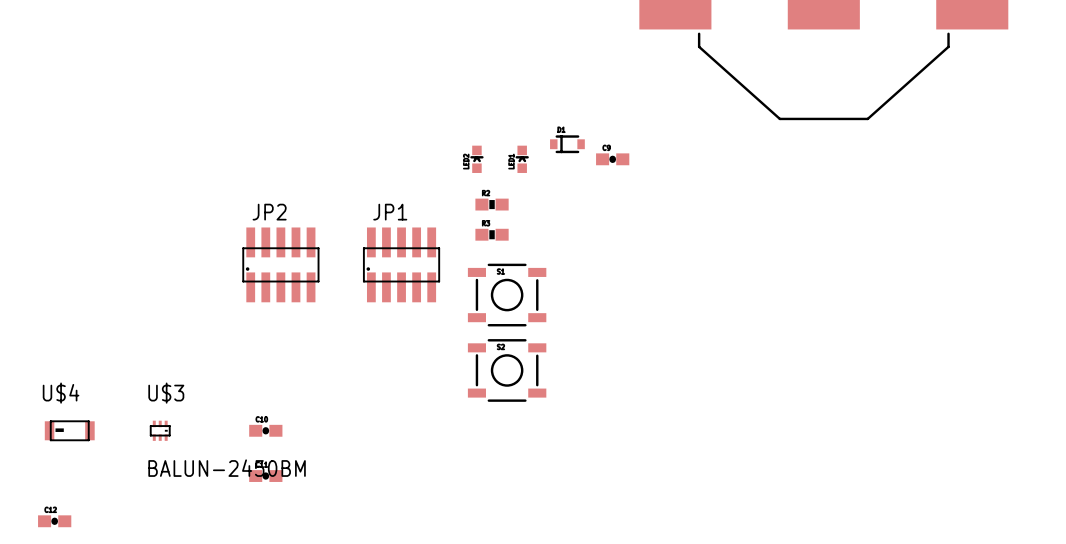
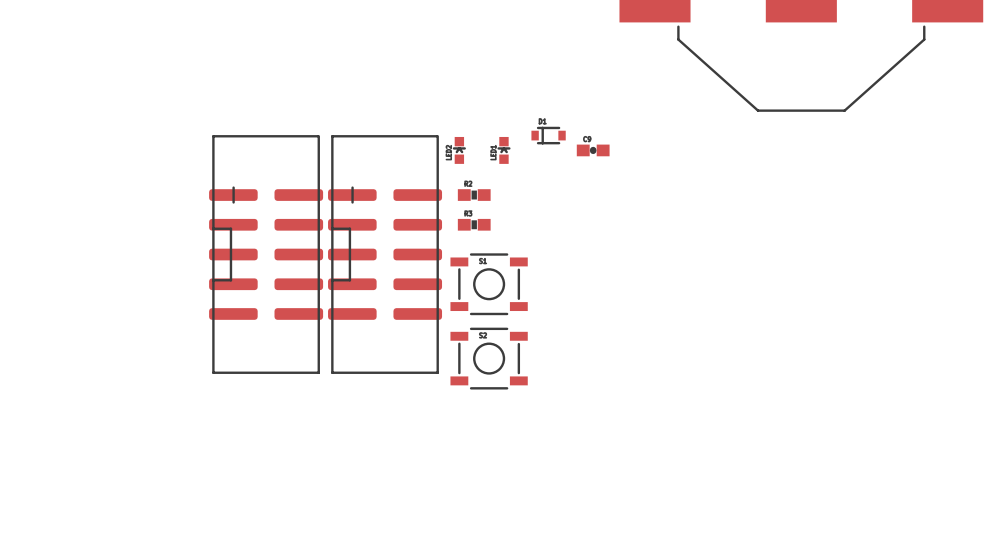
JP2: (280, 264) -> none
part: none -> (266, 254)
JP1: (401, 264) -> none
part: none -> (385, 254)
U$4: (69, 430) -> none
U$3: BALUN-2450BM (160, 430) -> none
part: (265, 430) -> none
part: (265, 476) -> none
part: (54, 521) -> none

